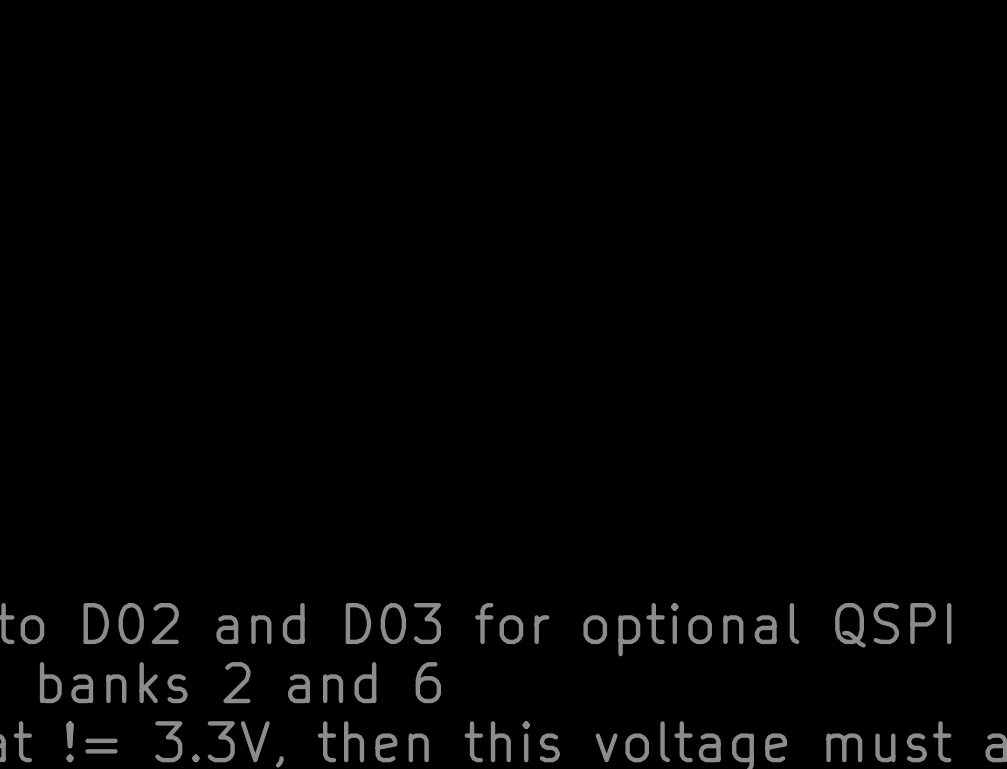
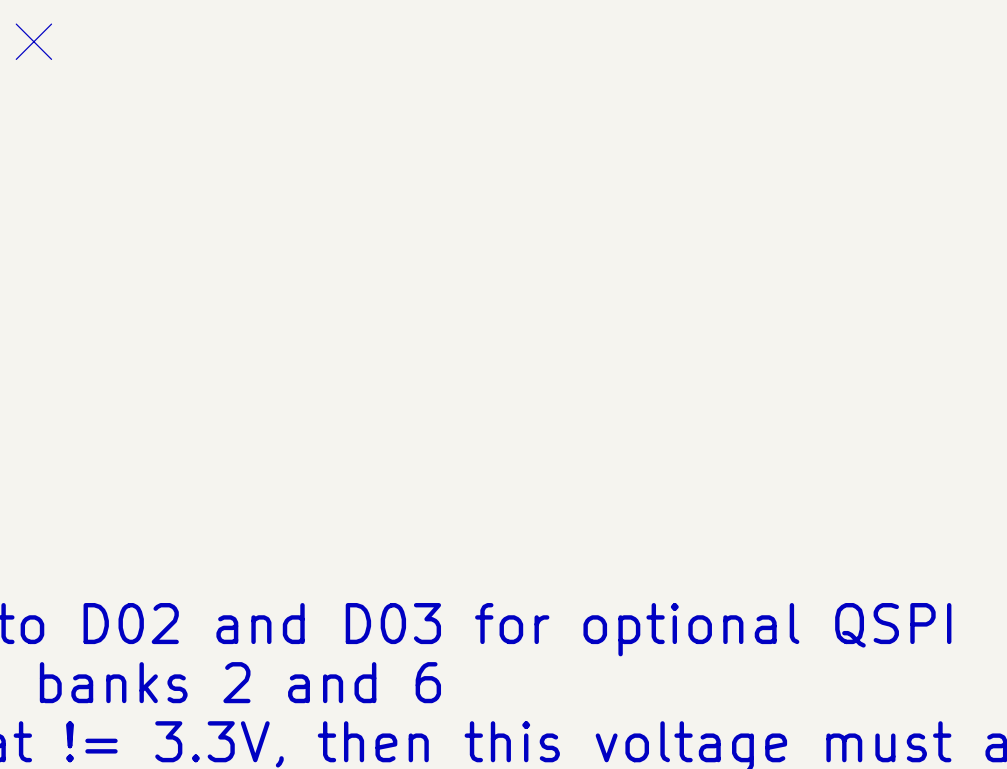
no-connect mark: none -> (33, 41)

